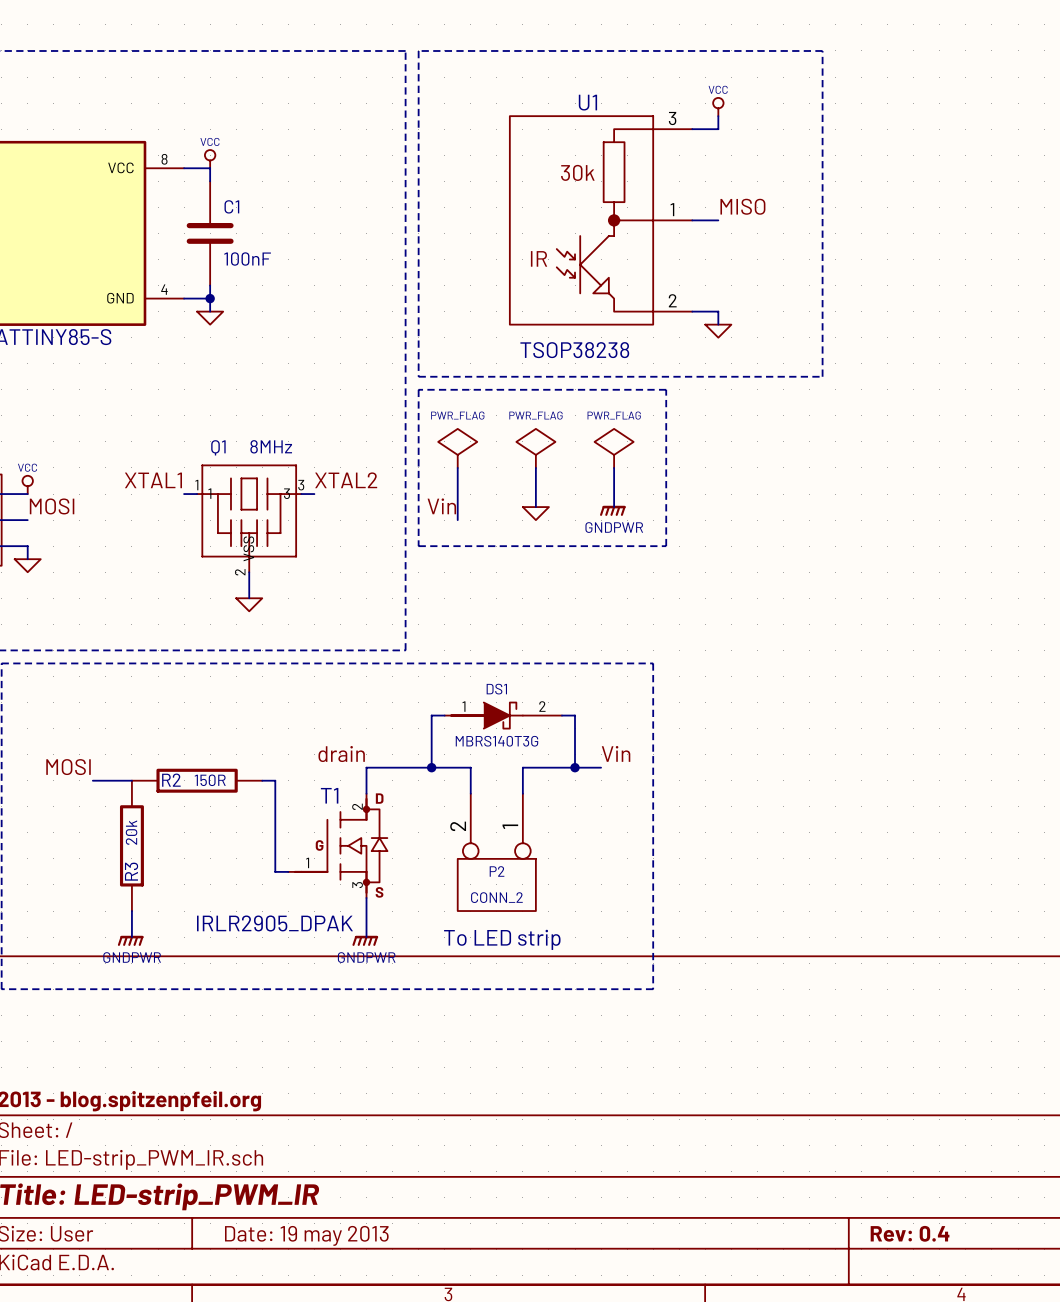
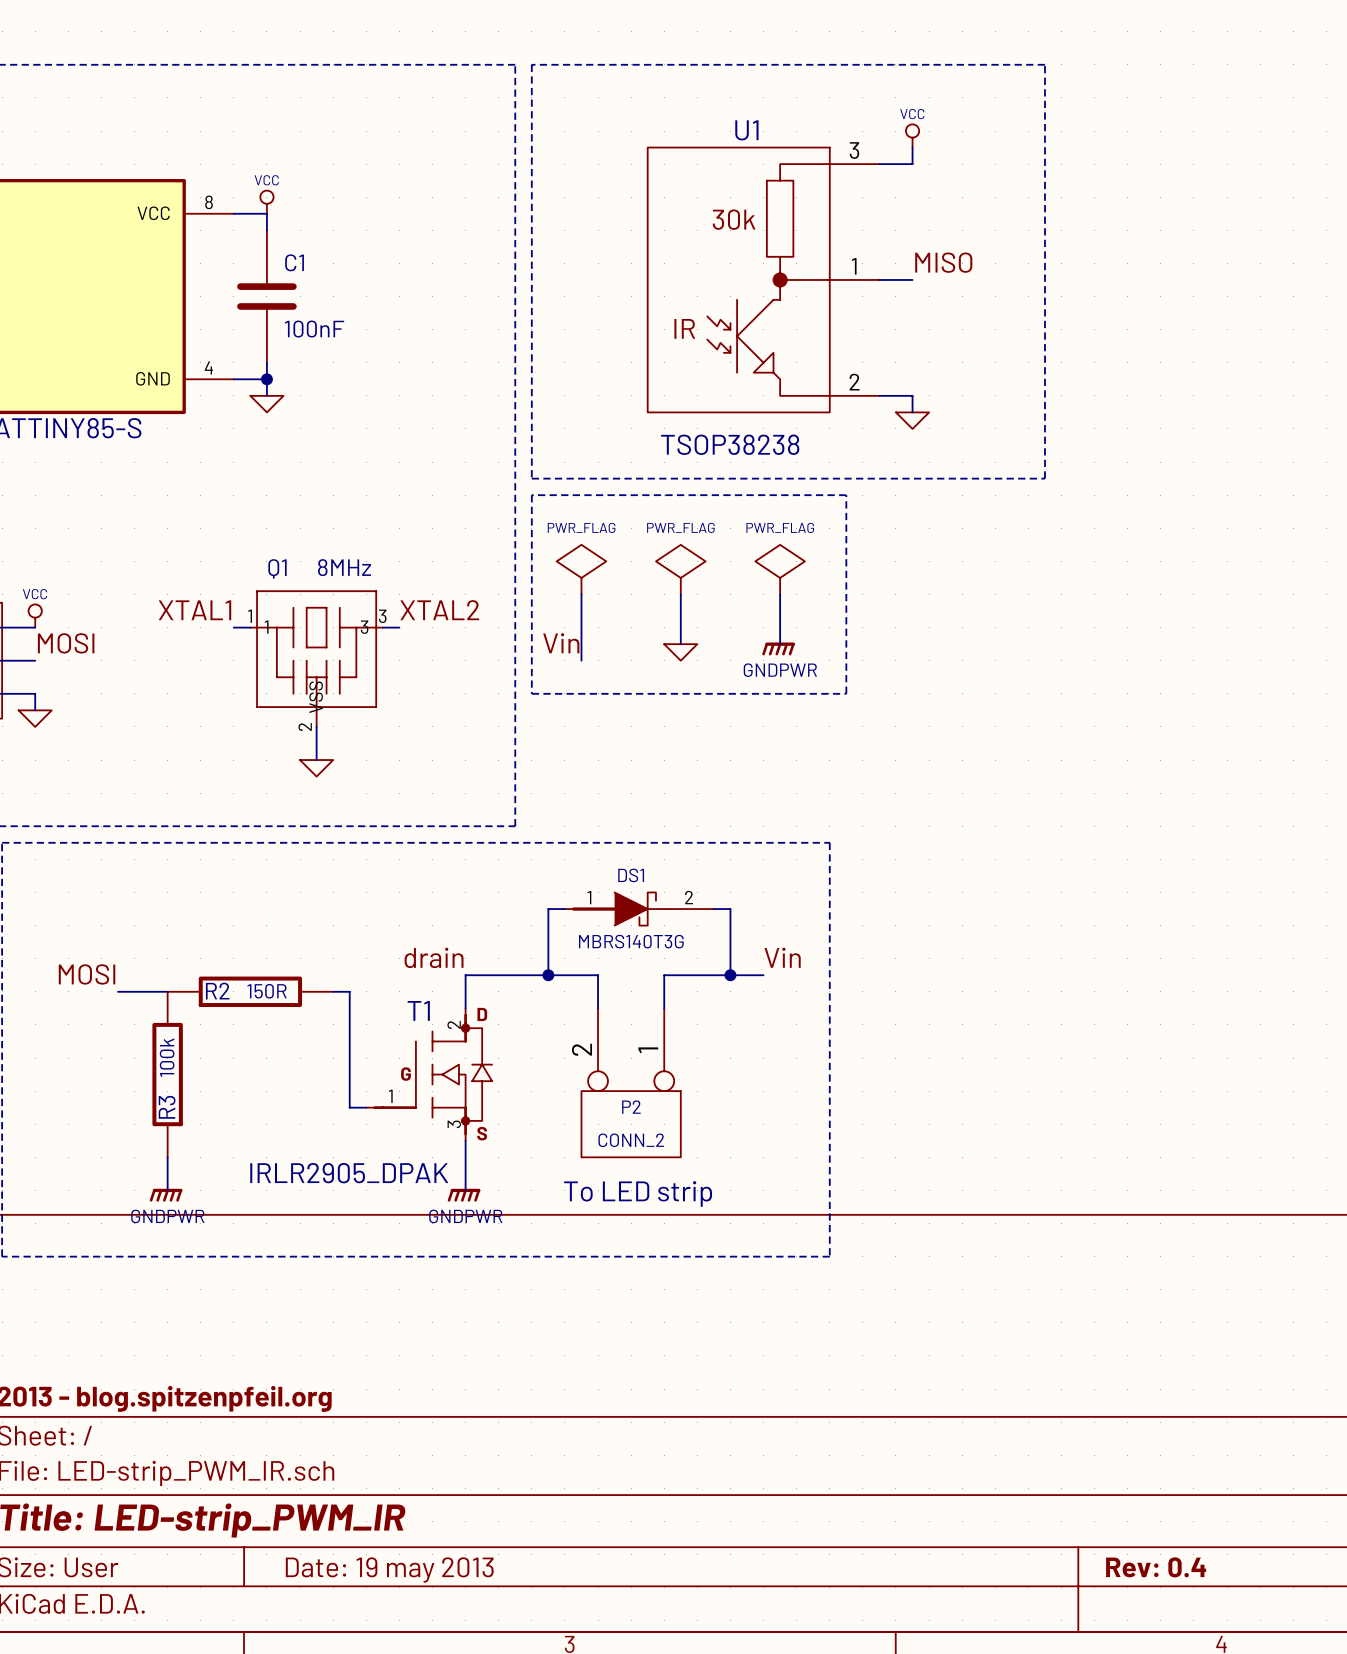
R3 value: 20k (131, 832) -> 100k (167, 1057)

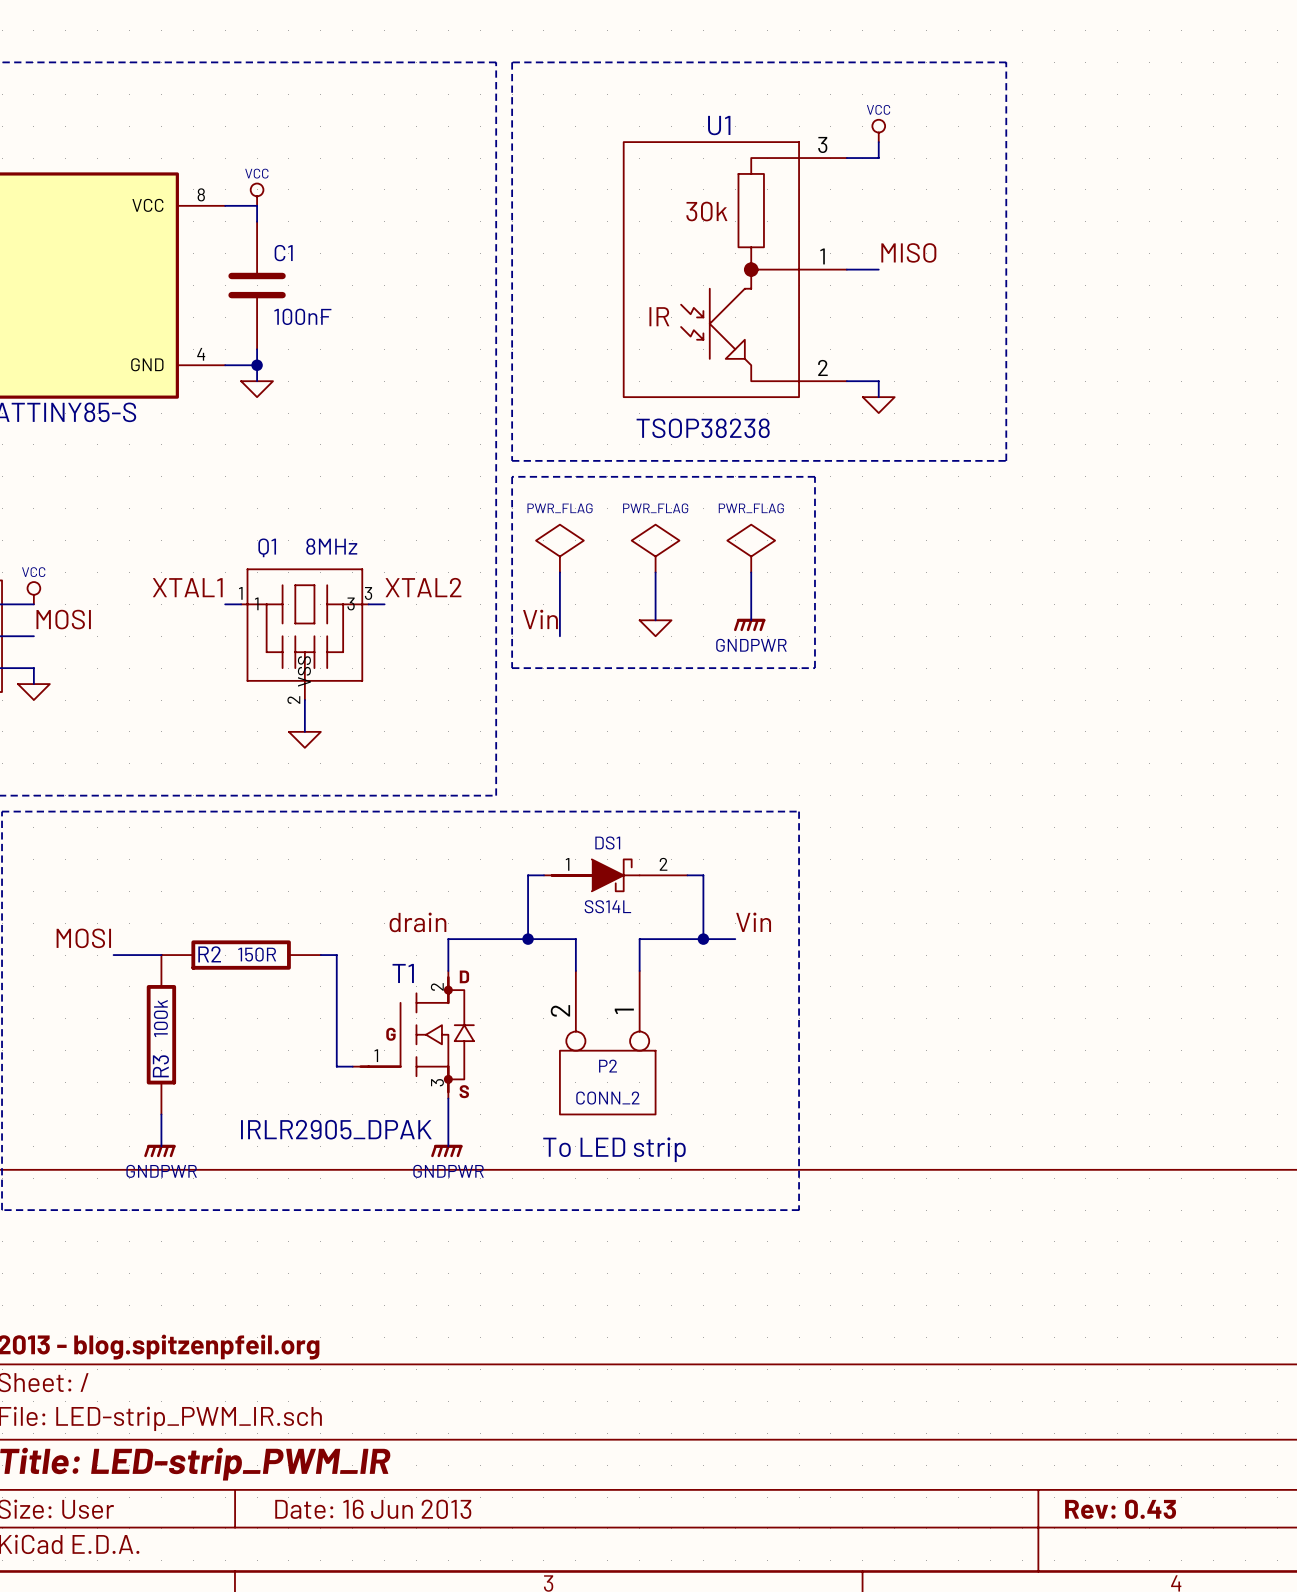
DS1 value: MBRS140T3G (631, 941) -> SS14L (607, 906)
title block: Rev: 0.4 (1156, 1567) -> Rev: 0.43 (1120, 1509)
title block: Date: 19 may 2013 (389, 1570) -> Date: 16 Jun 2013 (373, 1509)

